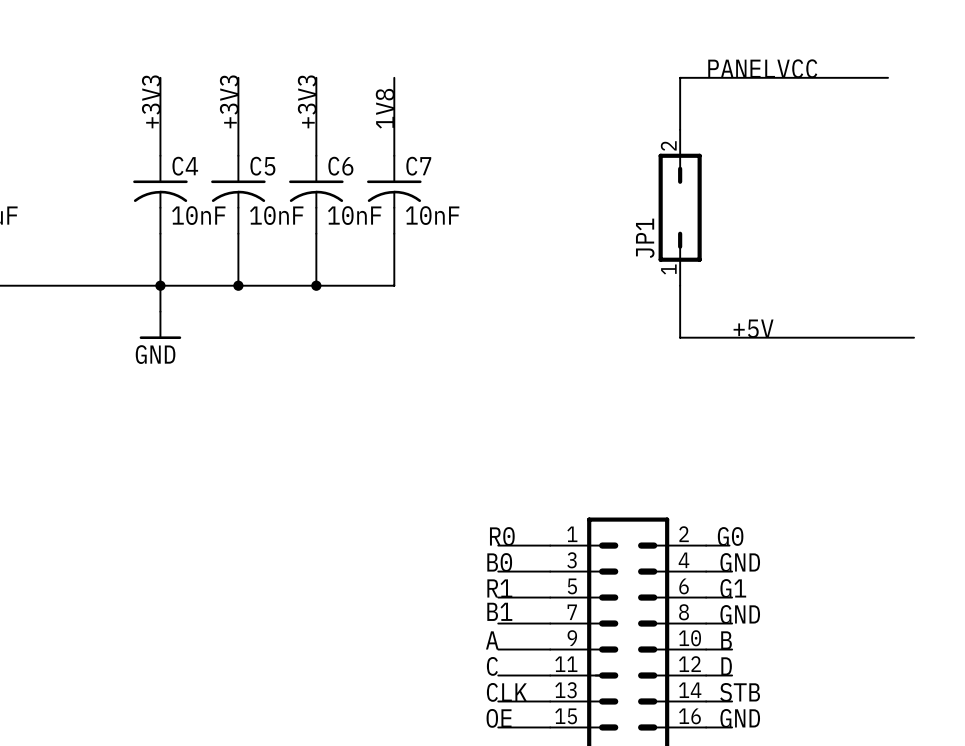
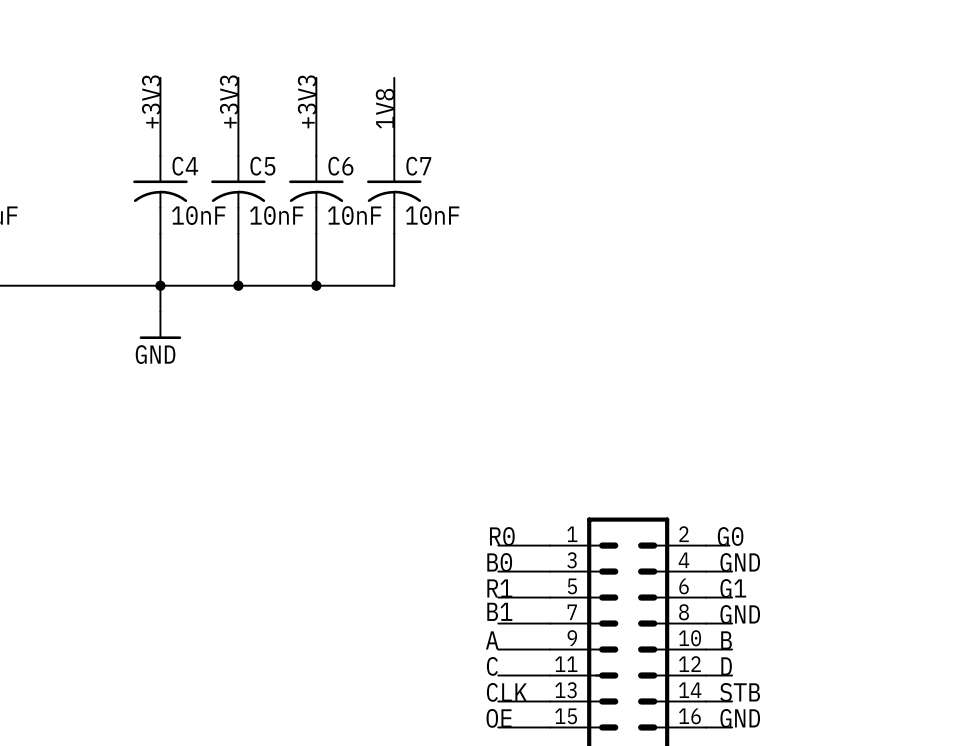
label: PANELVCC (762, 68) -> none
wire: (888, 77) (680, 77) (680, 129) -> none
JP1: (680, 207) -> none
wire: (680, 285) (680, 337) (914, 337) -> none
label: +5V (753, 328) -> none

